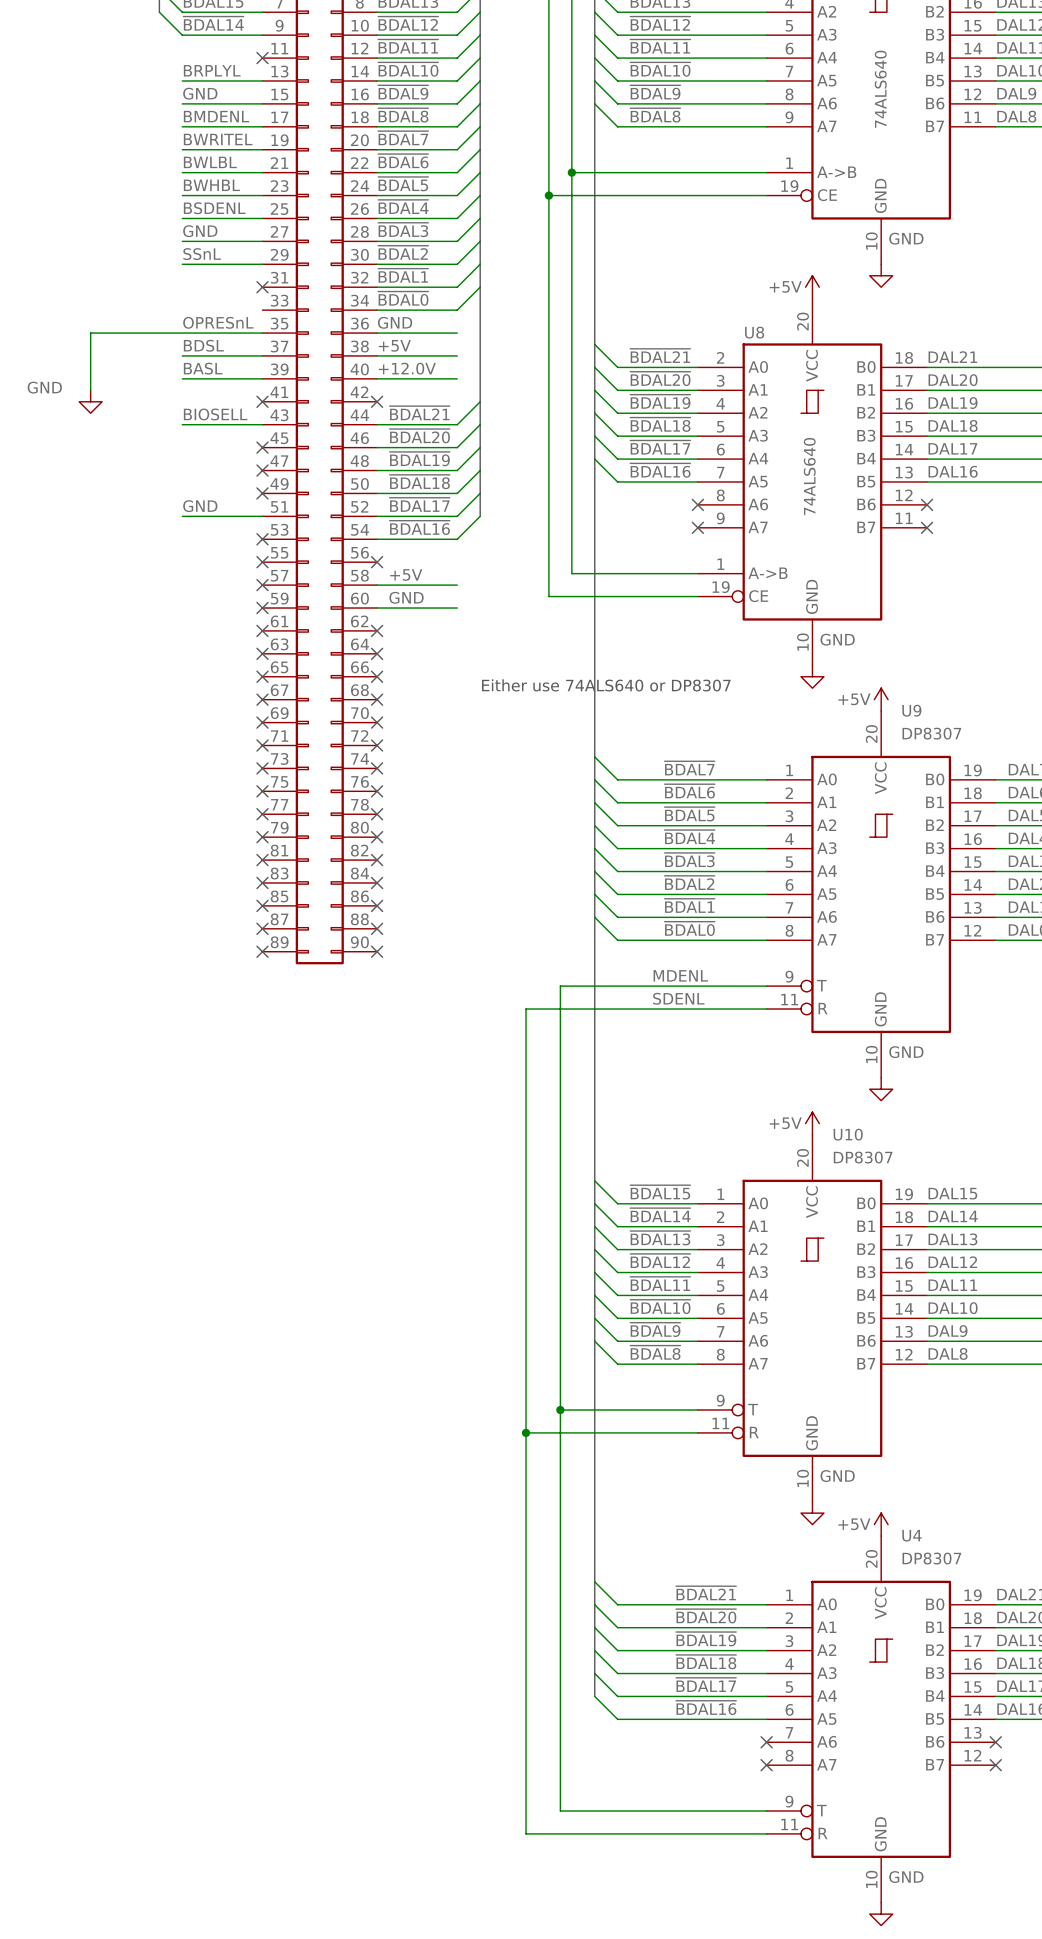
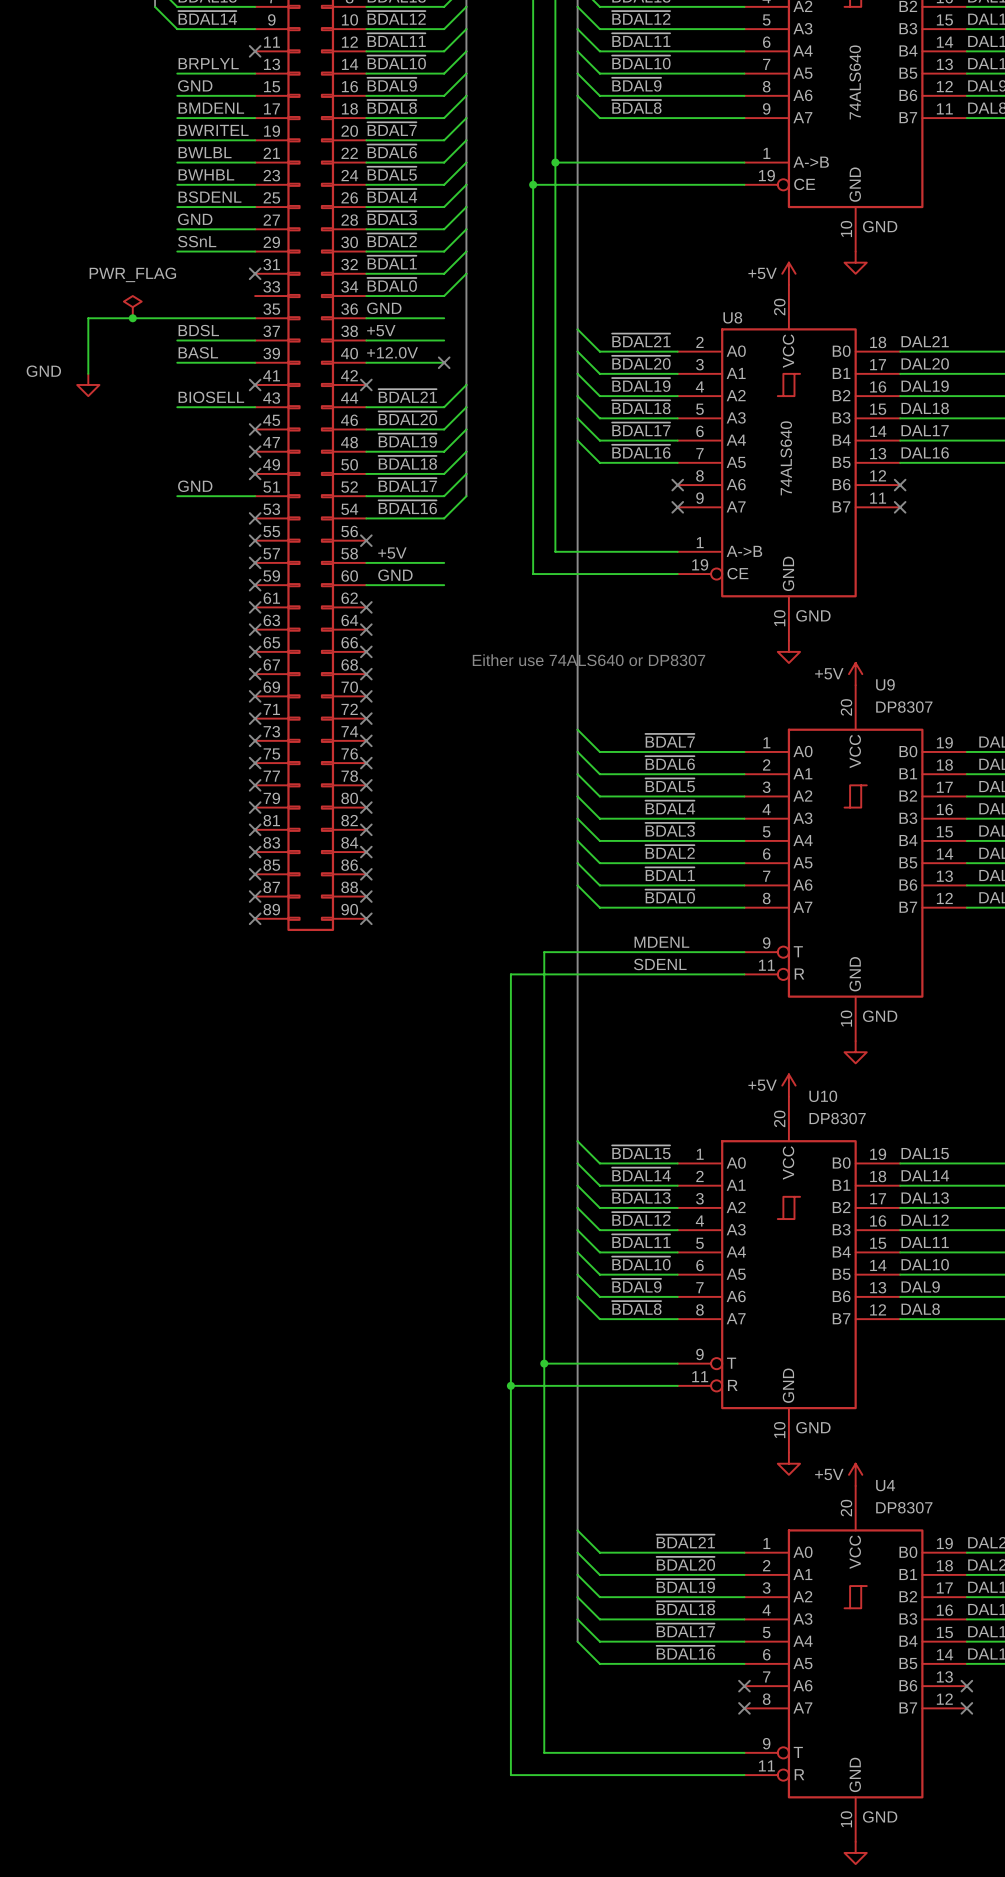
power symbol: none -> PWR_FLAG (132, 307)
label: OPRESnL (218, 322) -> none
junction: none -> (132, 318)
no-connect mark: none -> (444, 362)

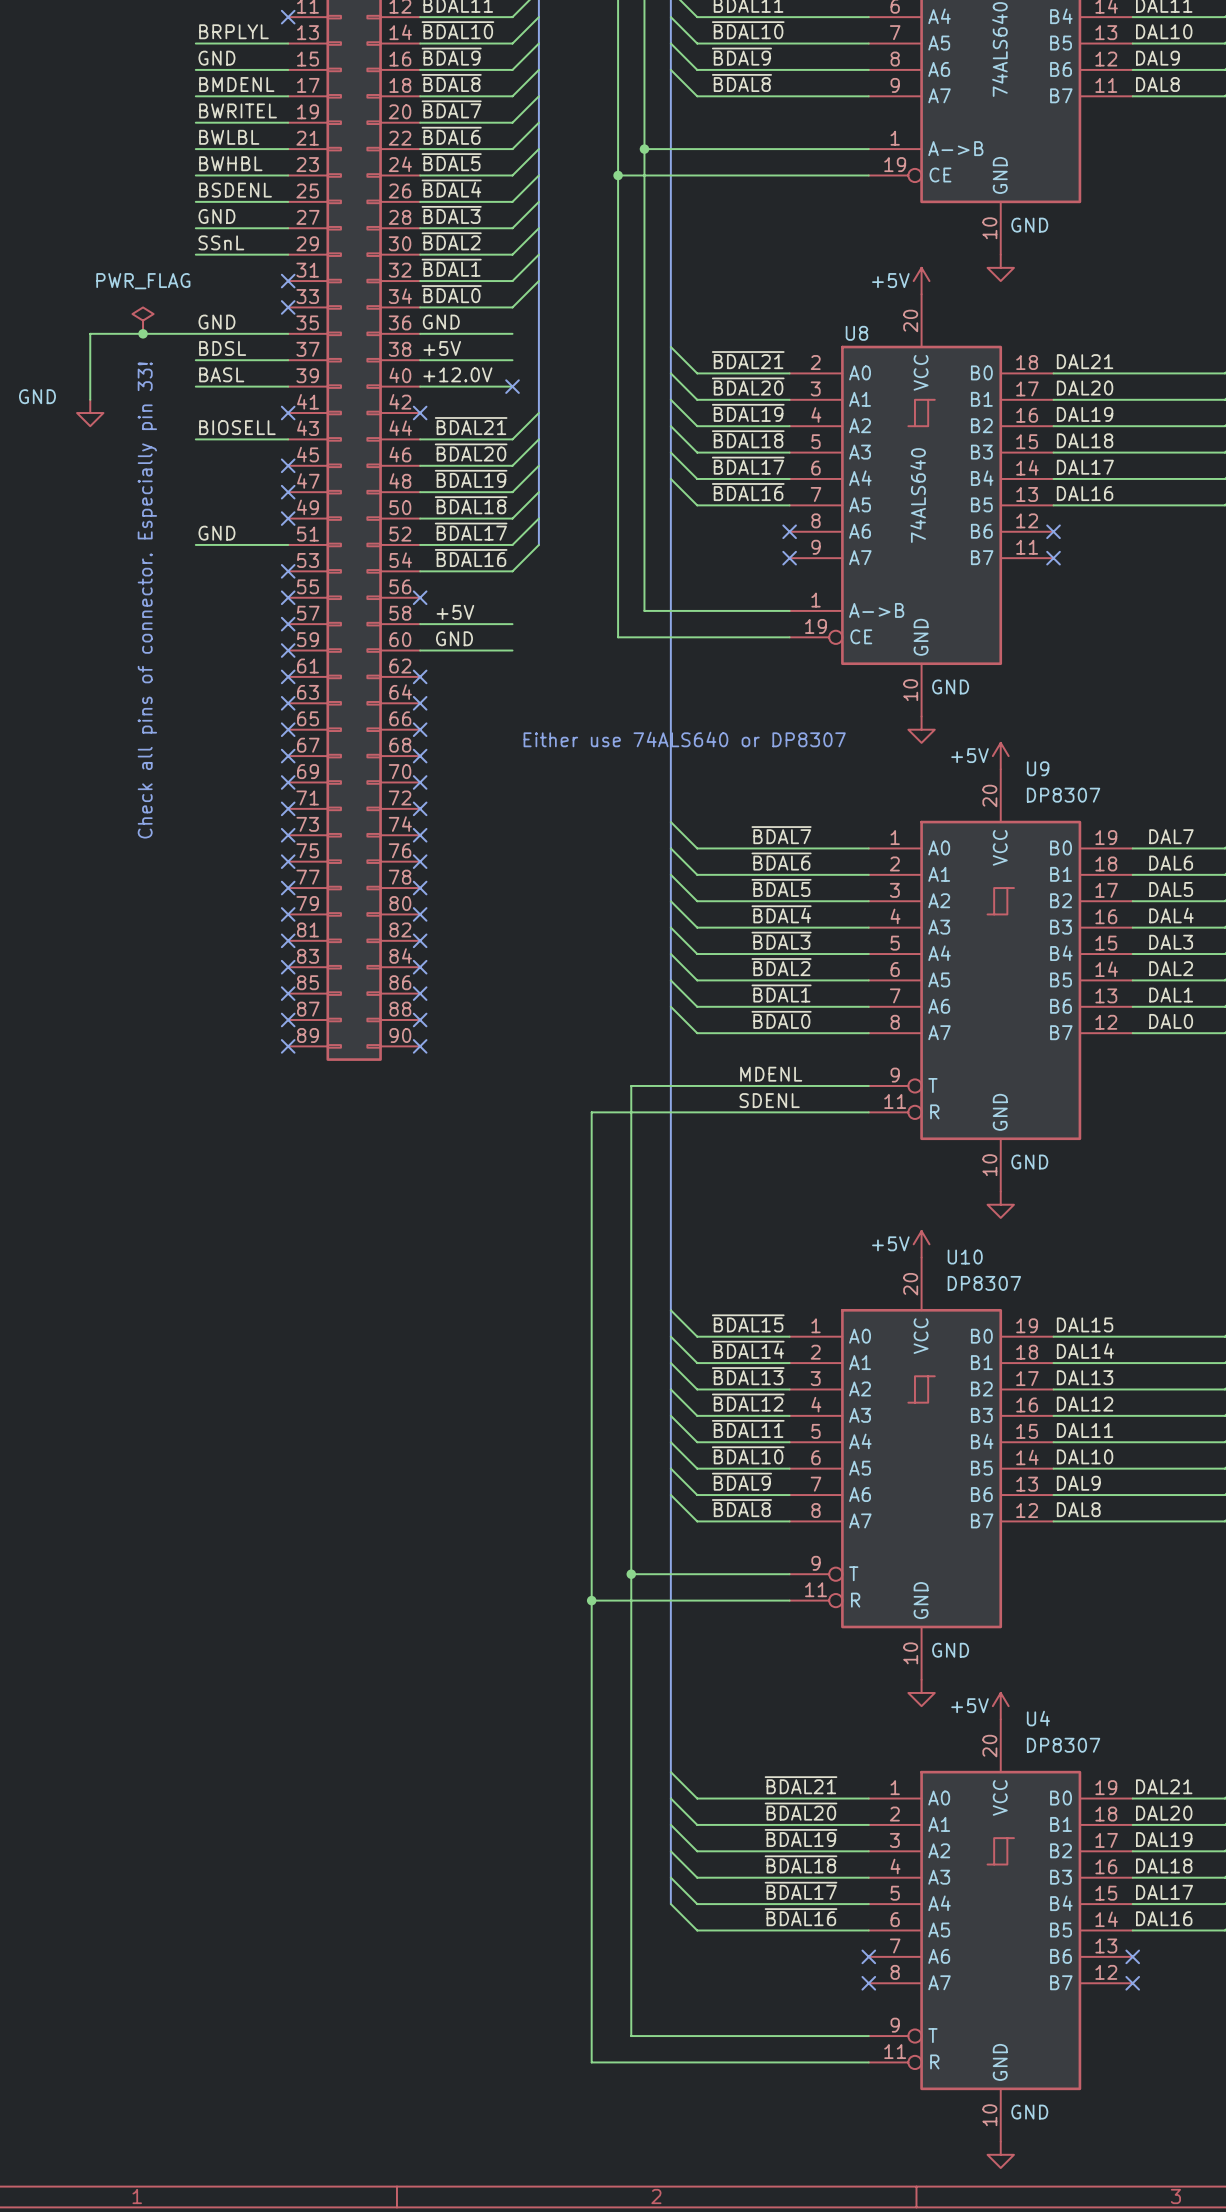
no-connect mark: none -> (288, 307)
label: none -> GND (216, 322)
text: none -> Check all pins of connector. Especially pin 33! (147, 600)

